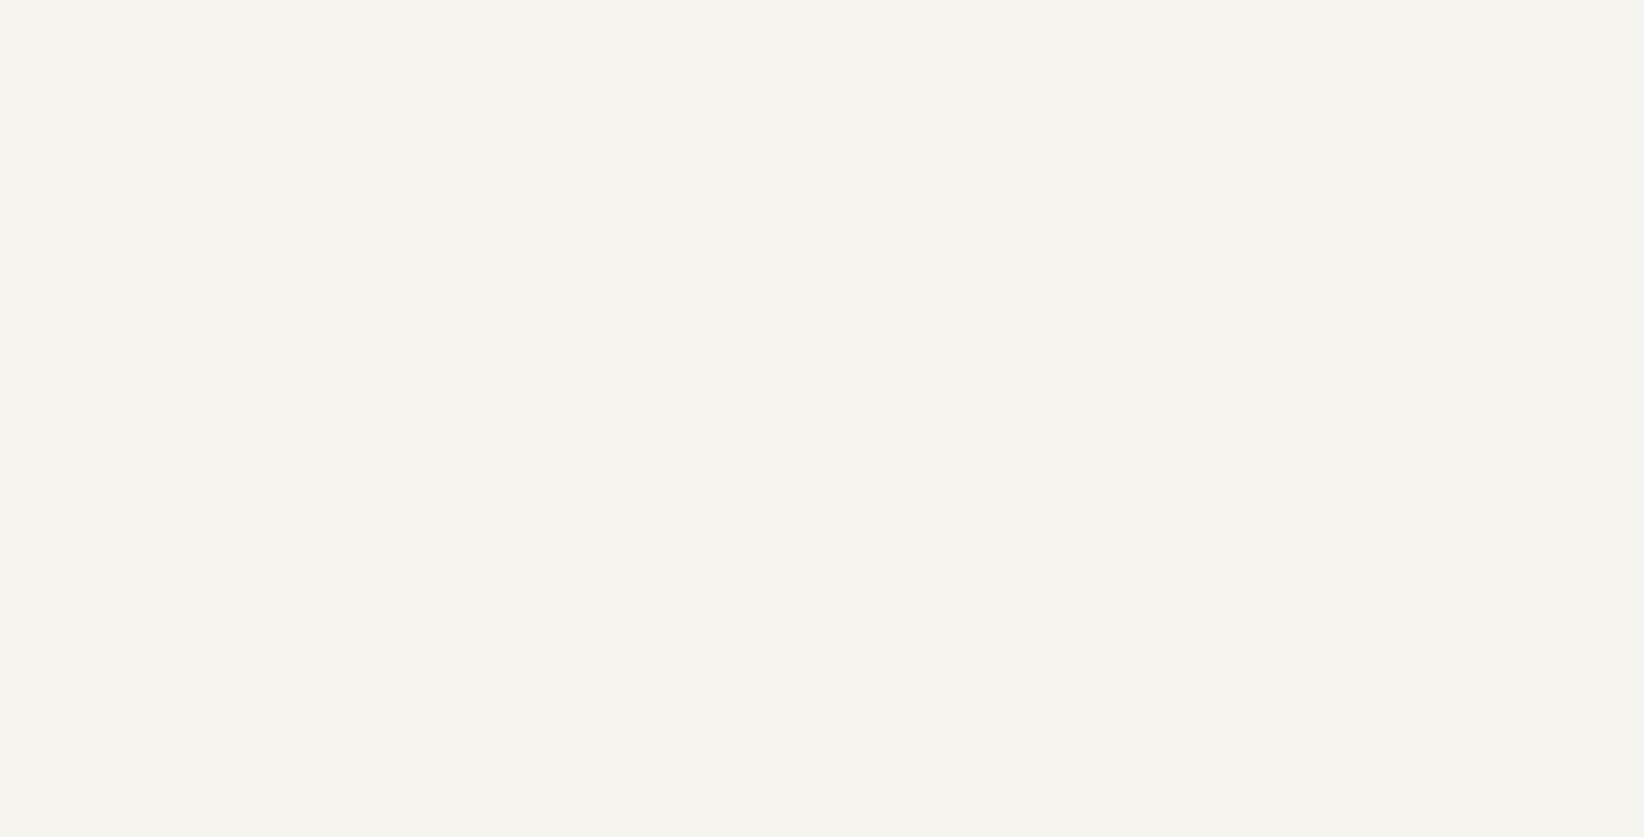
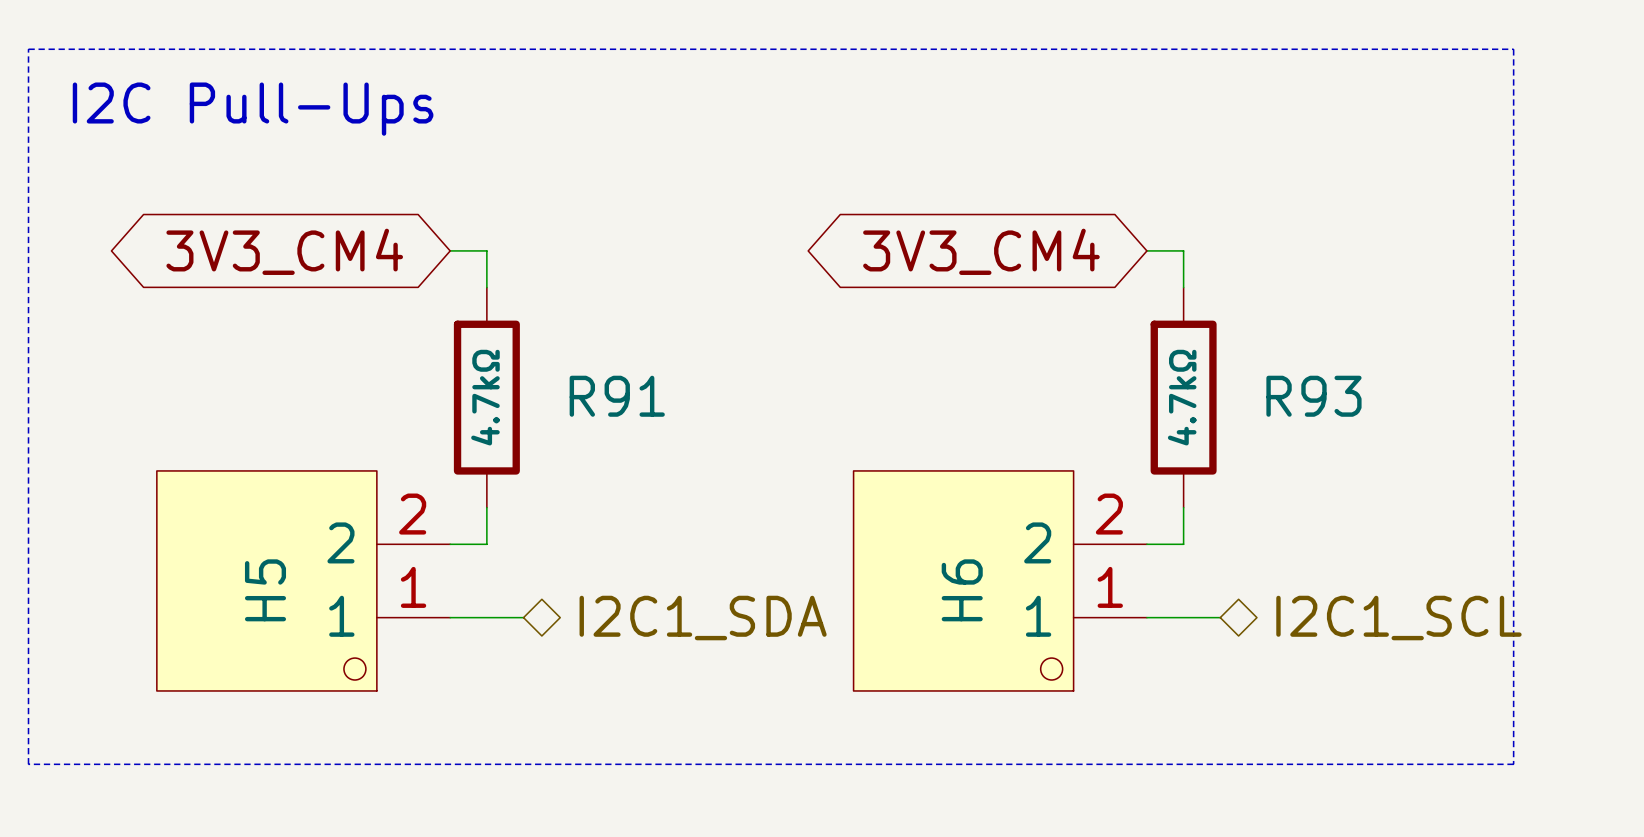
line: none -> (28, 49) (1513, 49) (1513, 764) (28, 764) (28, 49)
text: none -> I2C Pull-Ups (253, 109)
wire: none -> (450, 250) (486, 250) (486, 287)
wire: none -> (1146, 250) (1183, 250) (1183, 287)
global label: none -> 3V3_CM4 (284, 251)
global label: none -> 3V3_CM4 (981, 251)
R91: none -> 4.7kΩ (486, 397)
R93: none -> 4.7kΩ (1183, 397)
wire: none -> (486, 507) (486, 544) (450, 544)
wire: none -> (1183, 507) (1183, 544) (1146, 544)
H5: none -> (303, 580)
H6: none -> (1000, 580)
wire: none -> (450, 617) (523, 617)
wire: none -> (1146, 617) (1220, 617)
hierarchical label: none -> I2C1_SDA (703, 618)
hierarchical label: none -> I2C1_SCL (1398, 618)

